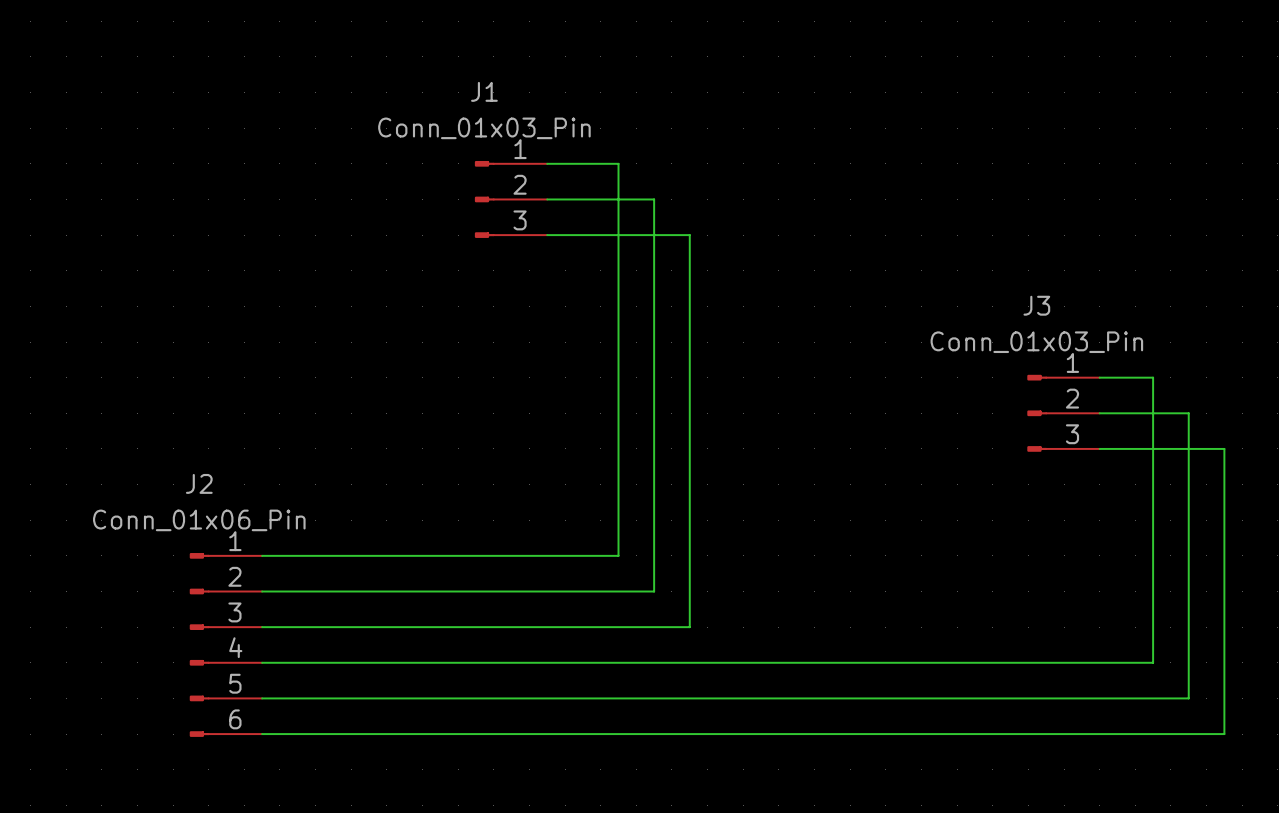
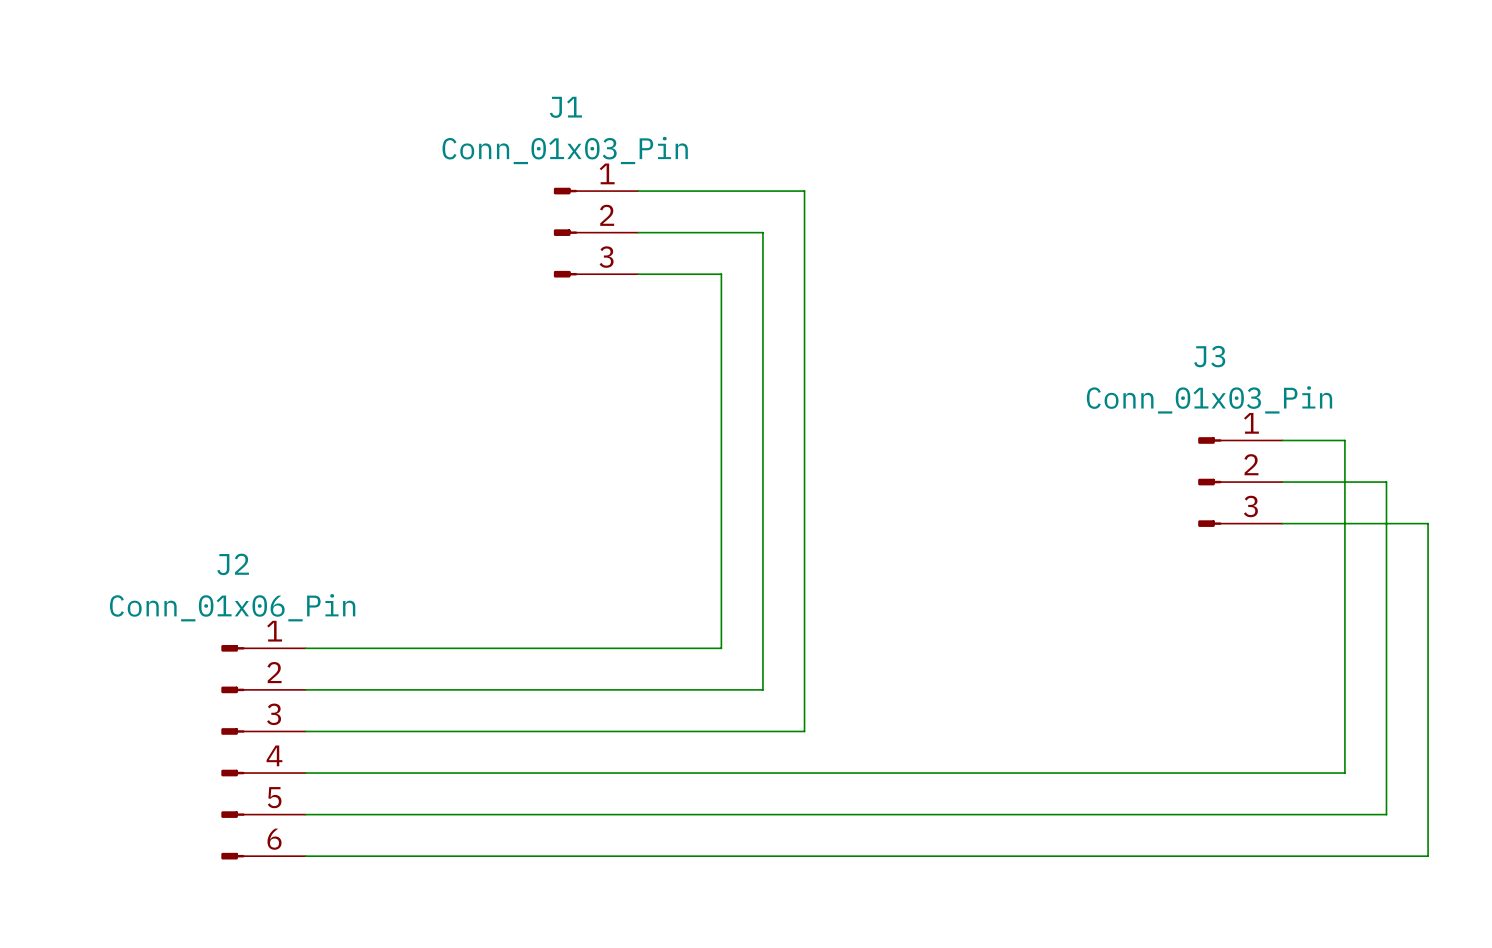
wire: (618, 163) (618, 235) (689, 235) -> (721, 191) (804, 191) (804, 274)

